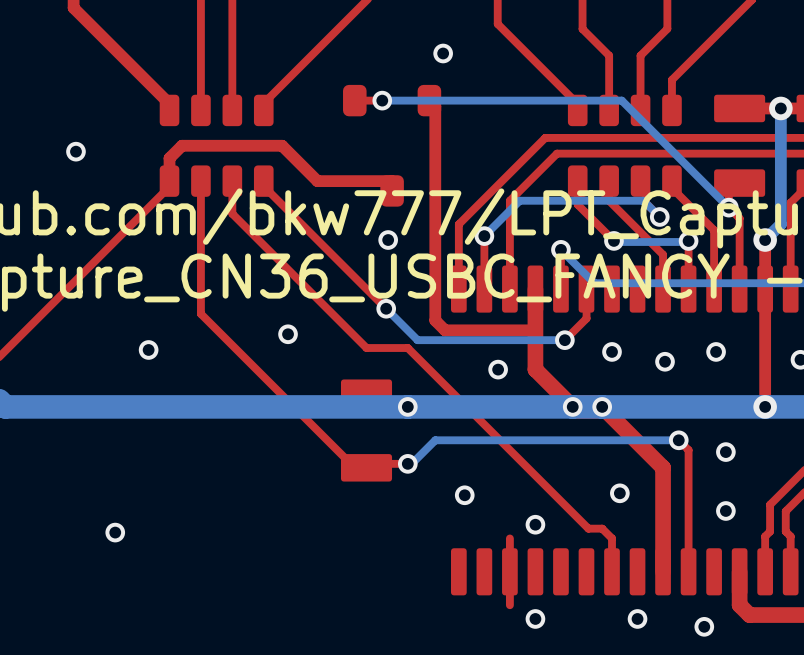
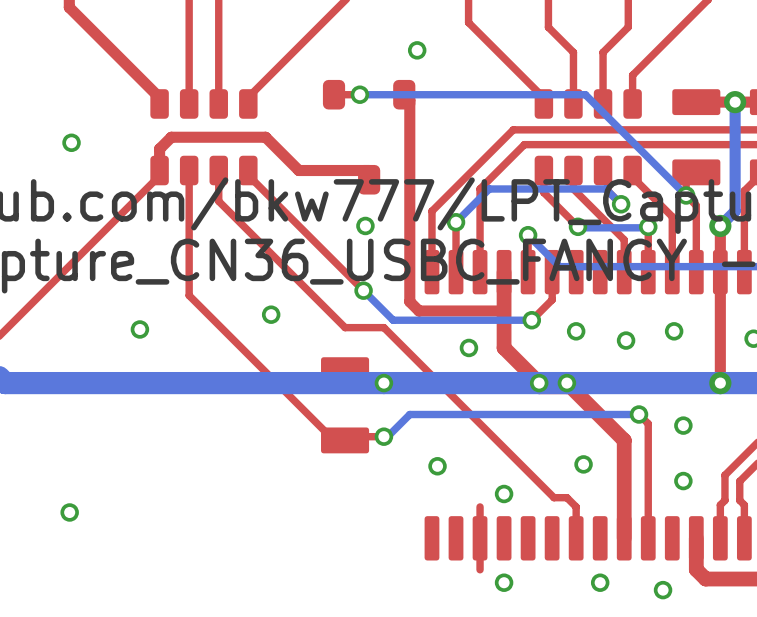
via position: (115, 532) -> (69, 512)

